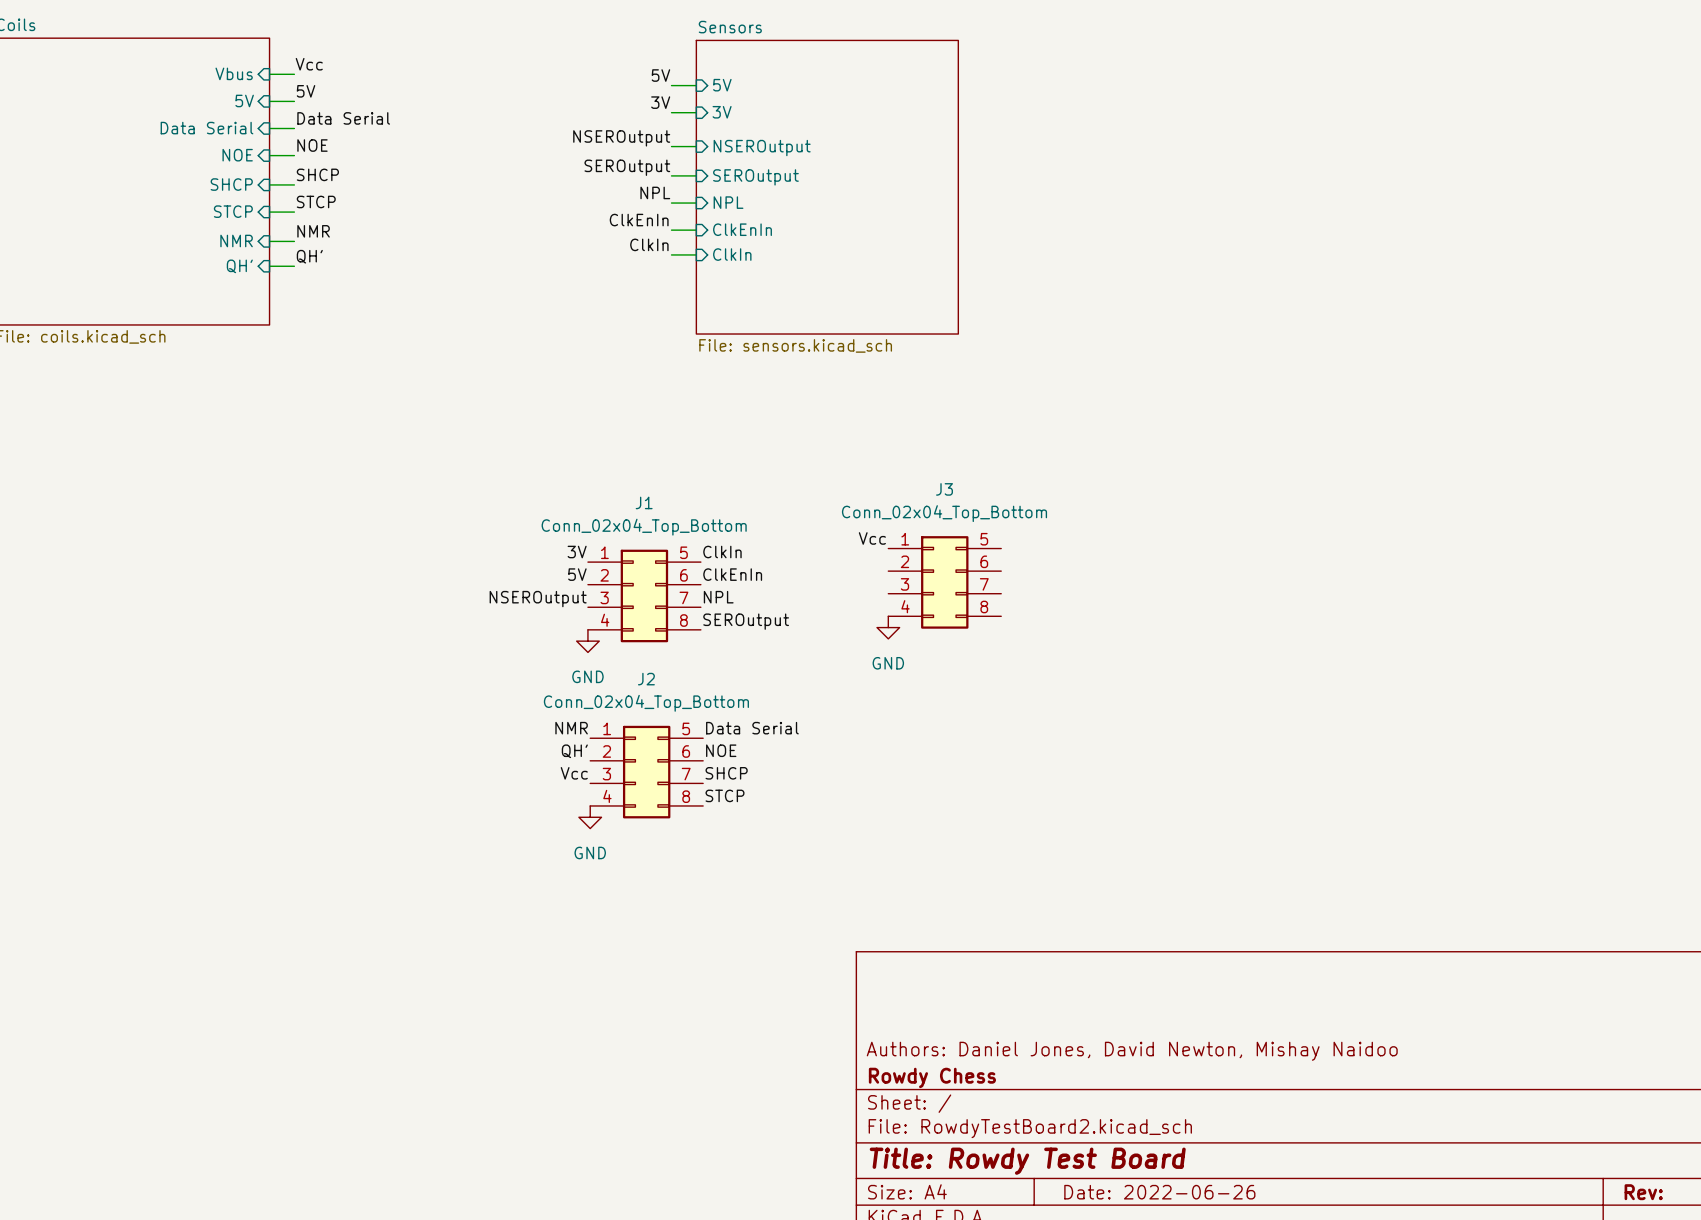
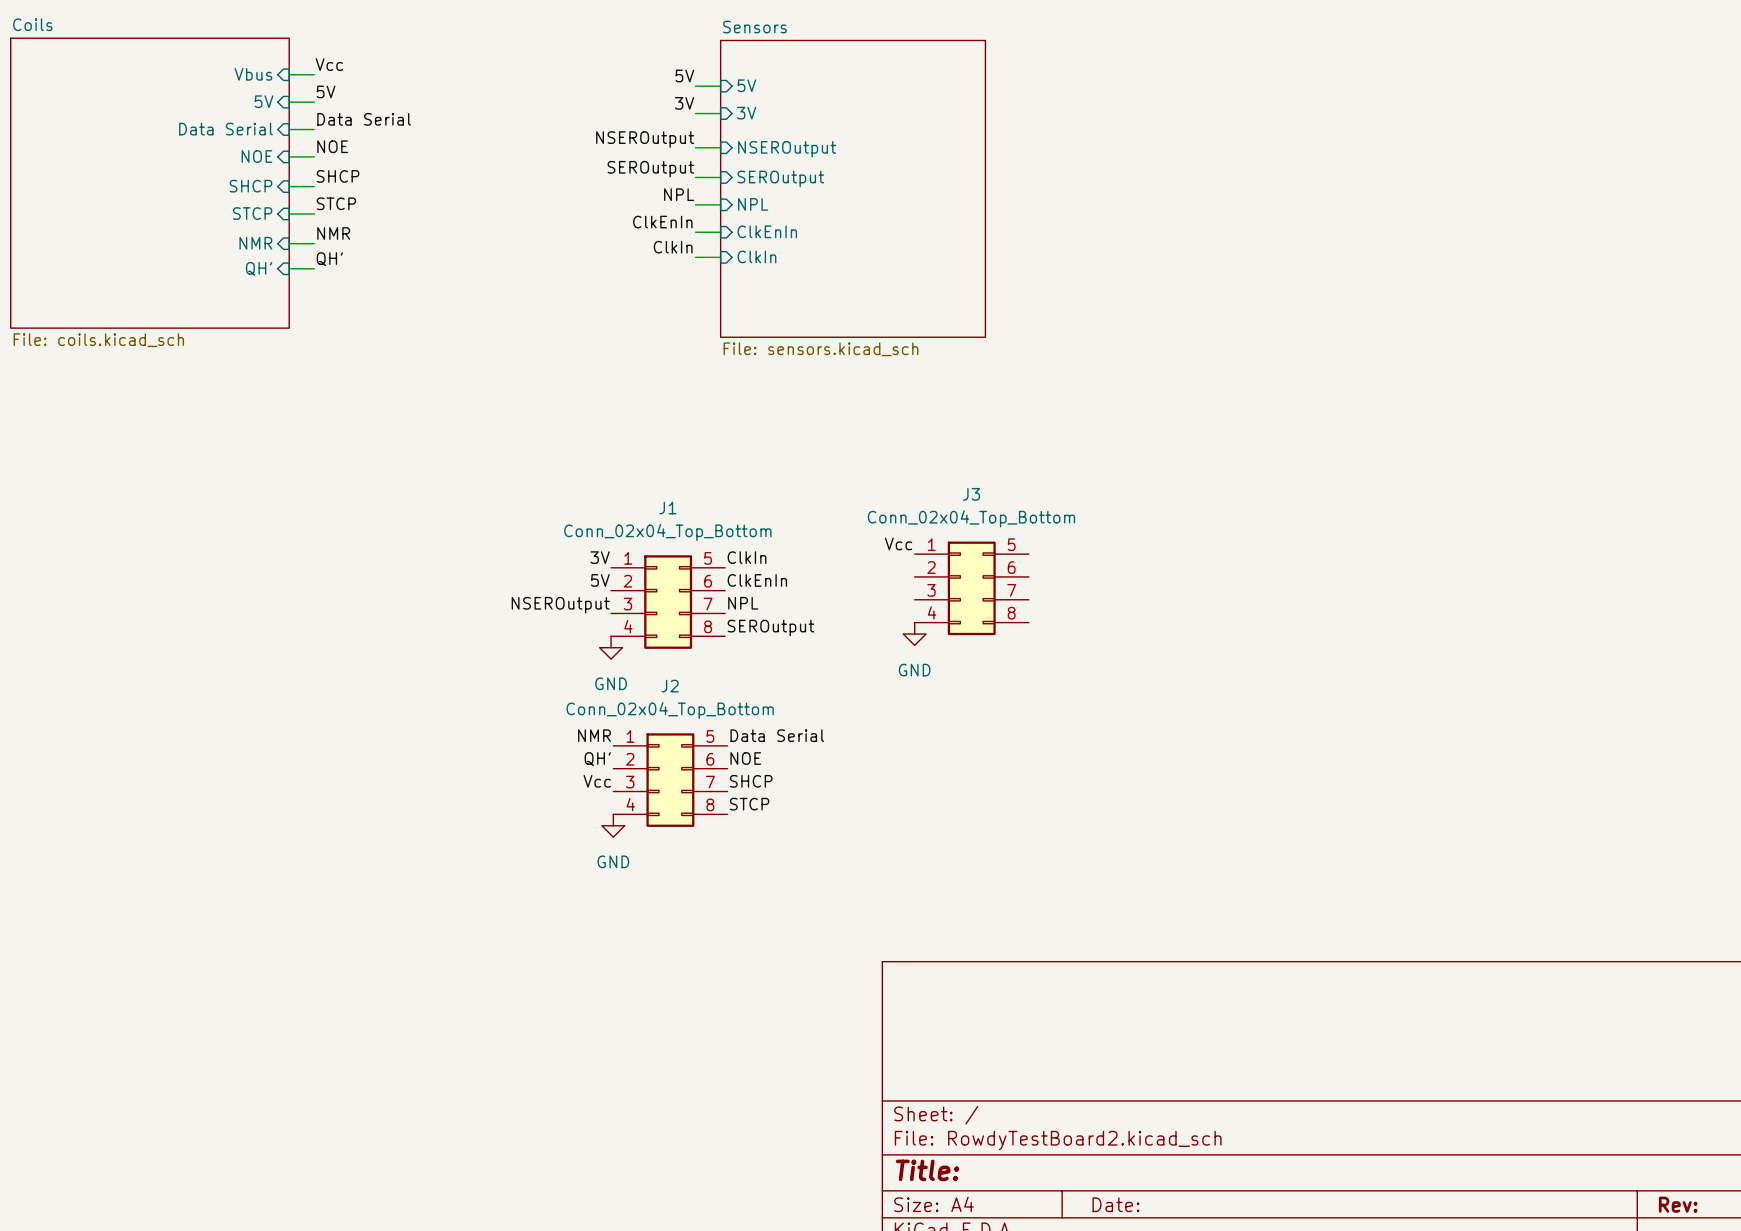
title block: Authors: Daniel Jones, David Newton, Mishay Naidoo (1132, 1051) -> none
title block: Rowdy Chess (932, 1077) -> none
title block: Title: Rowdy Test Board (1027, 1161) -> Title: (927, 1170)
title block: Date: 2022-06-26 (1159, 1192) -> Date: (1115, 1204)

